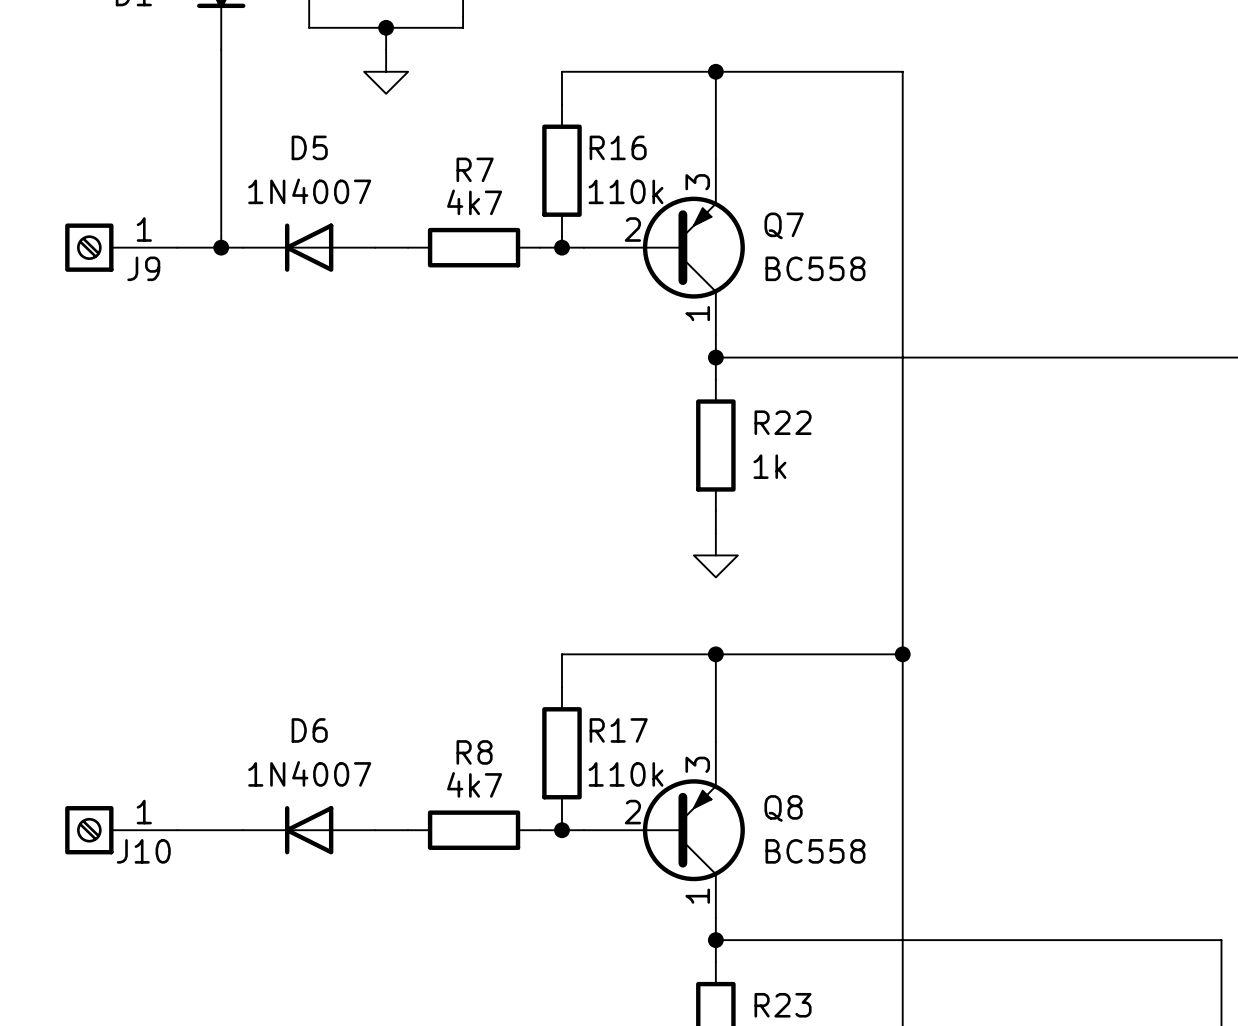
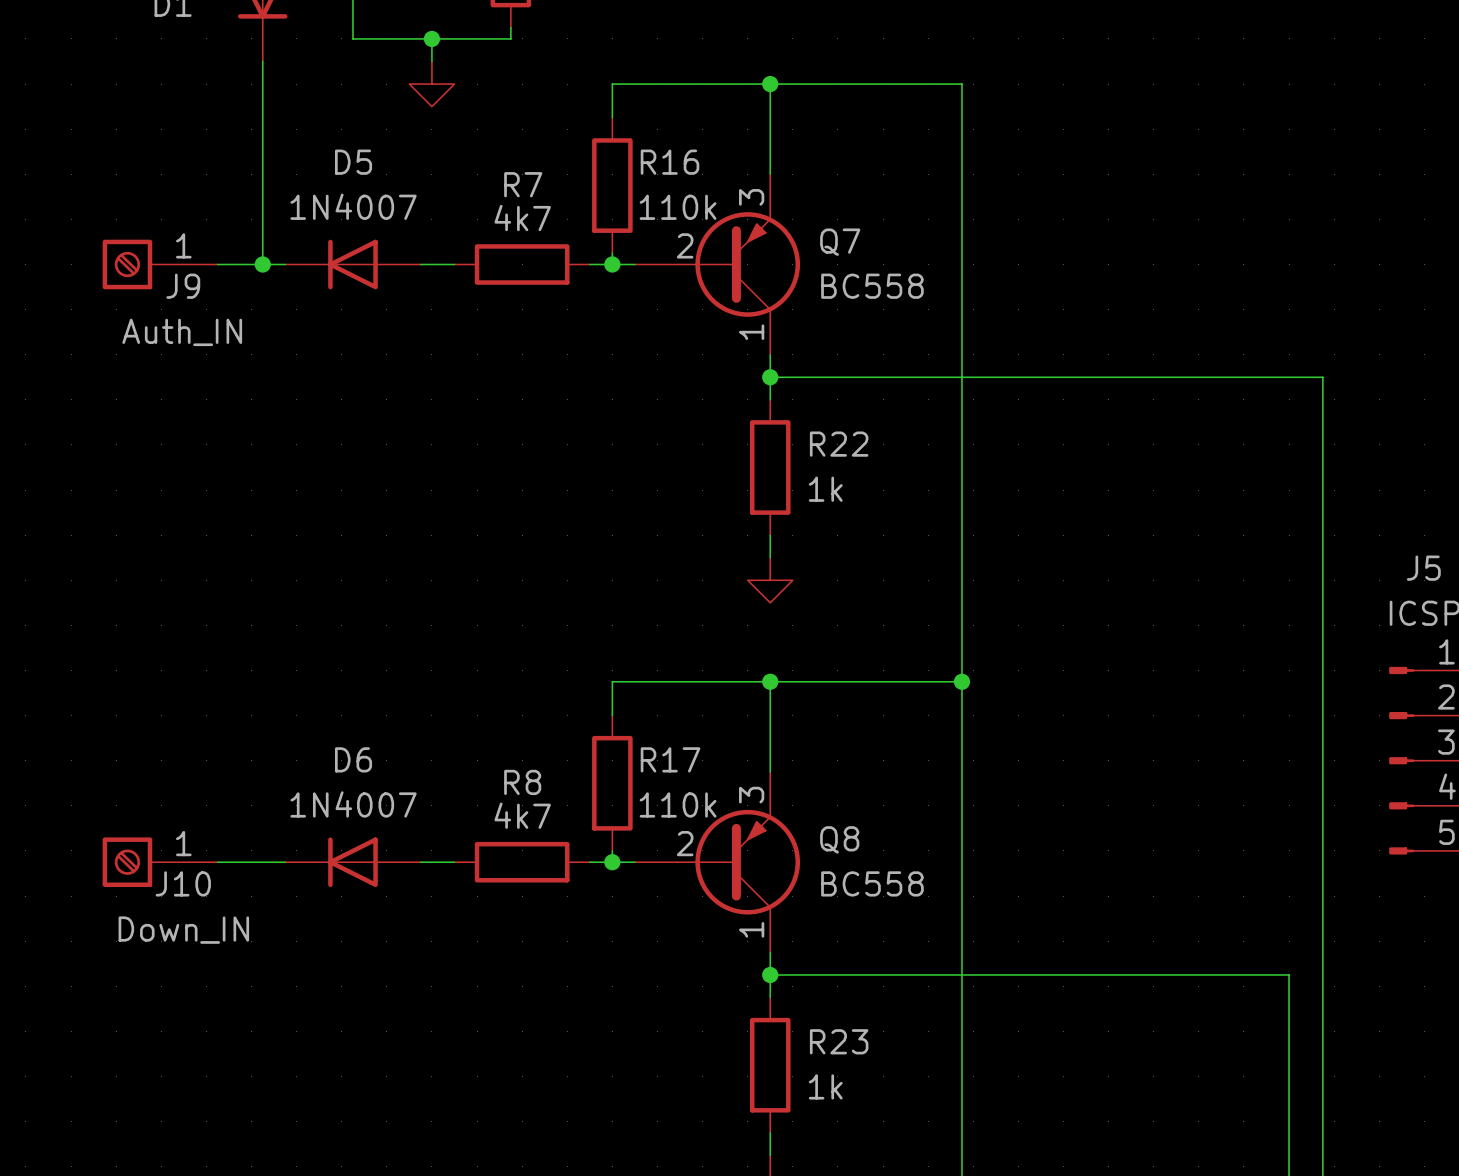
J9 value: none -> Auth_IN (182, 332)
J10 value: none -> Down_IN (183, 930)

